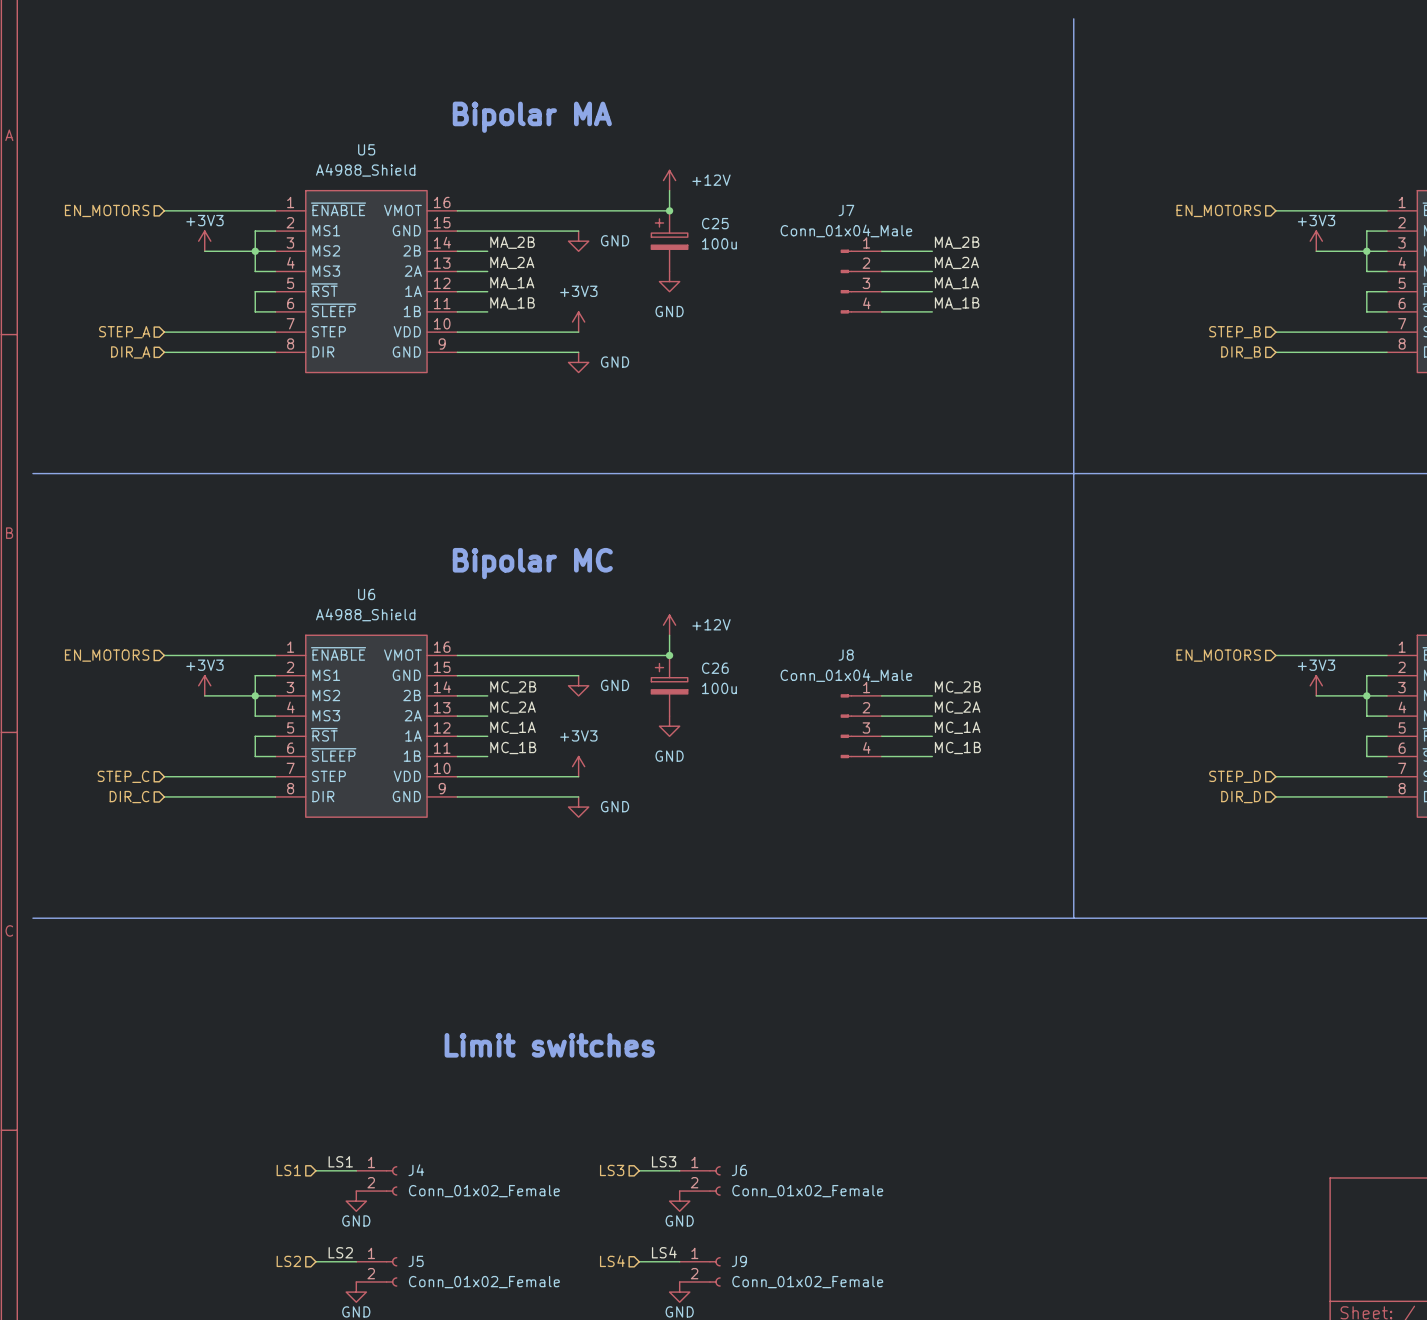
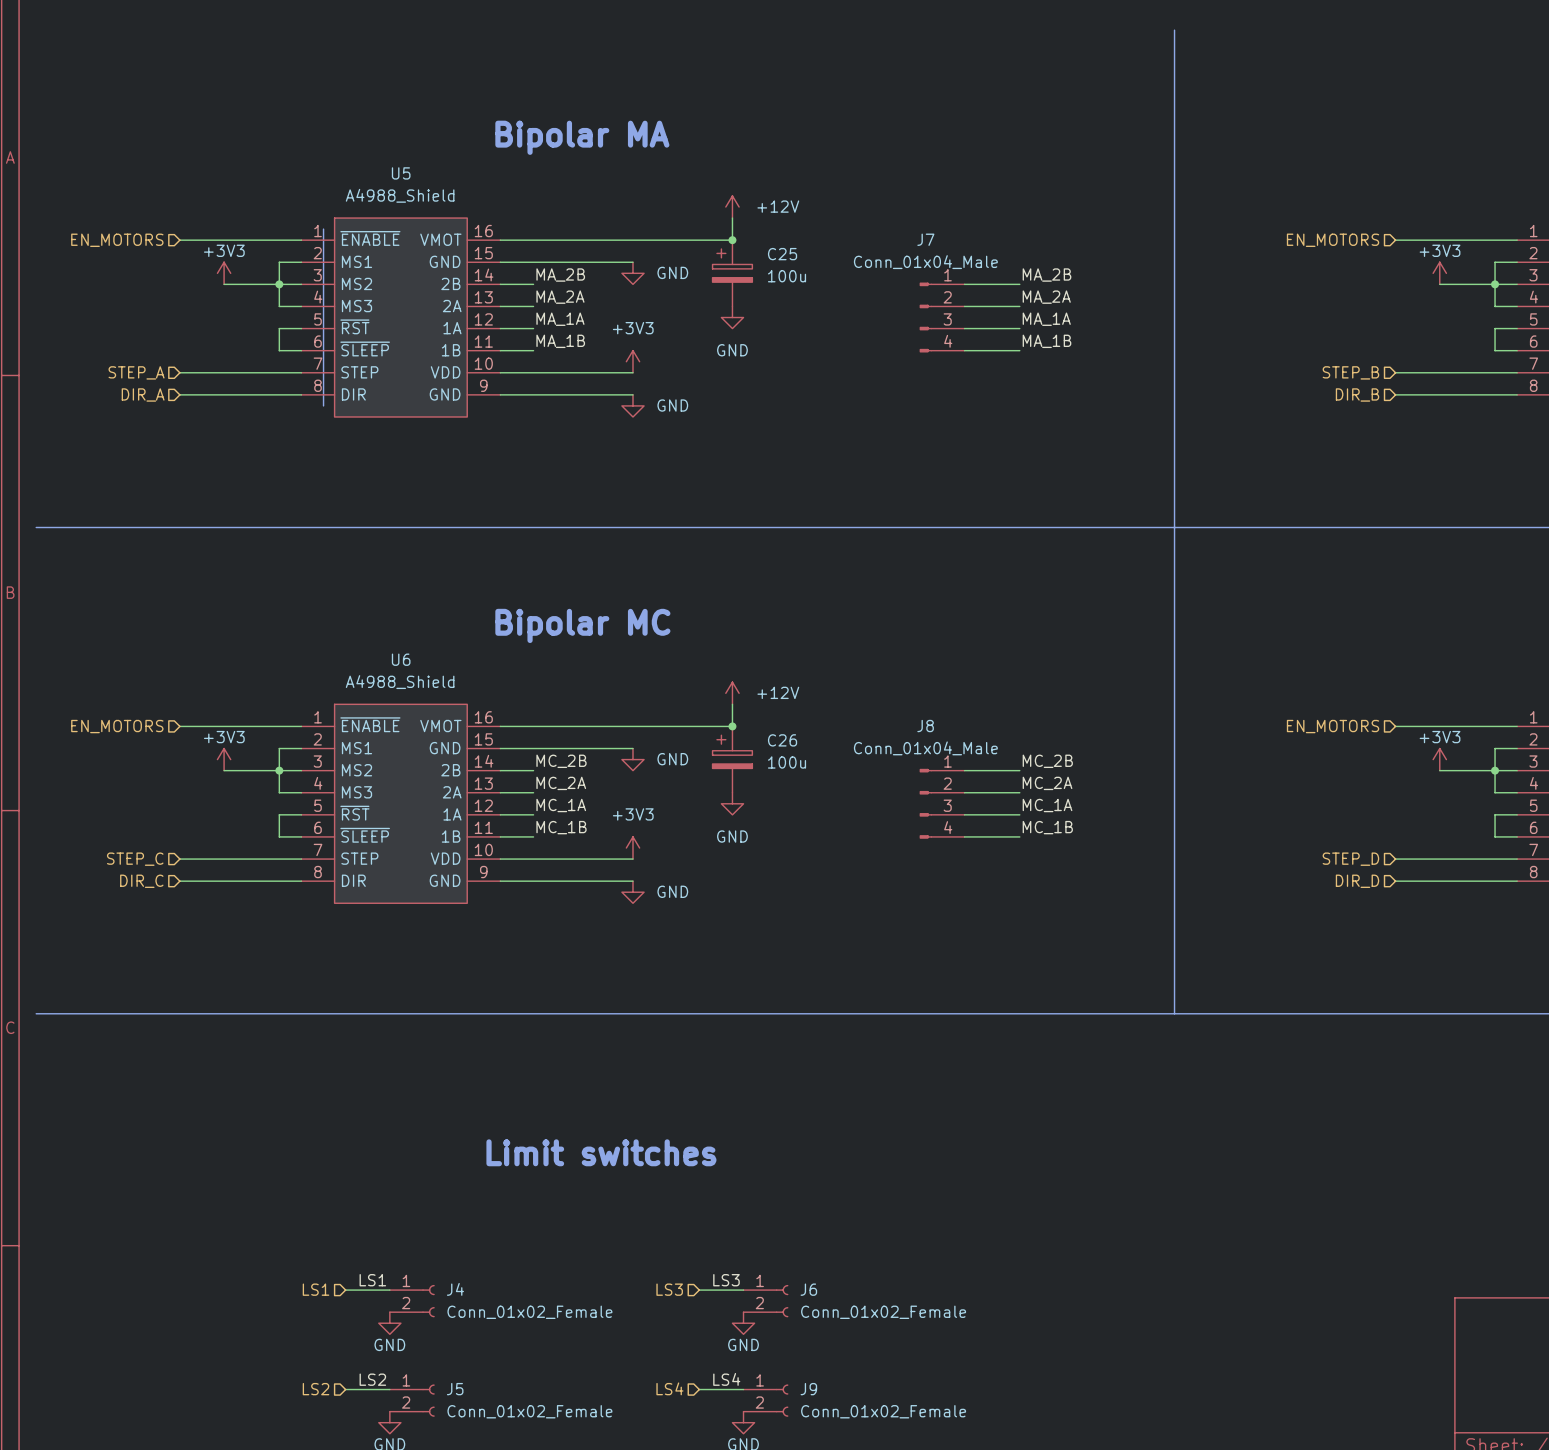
line: none -> (323, 229) (323, 405)

